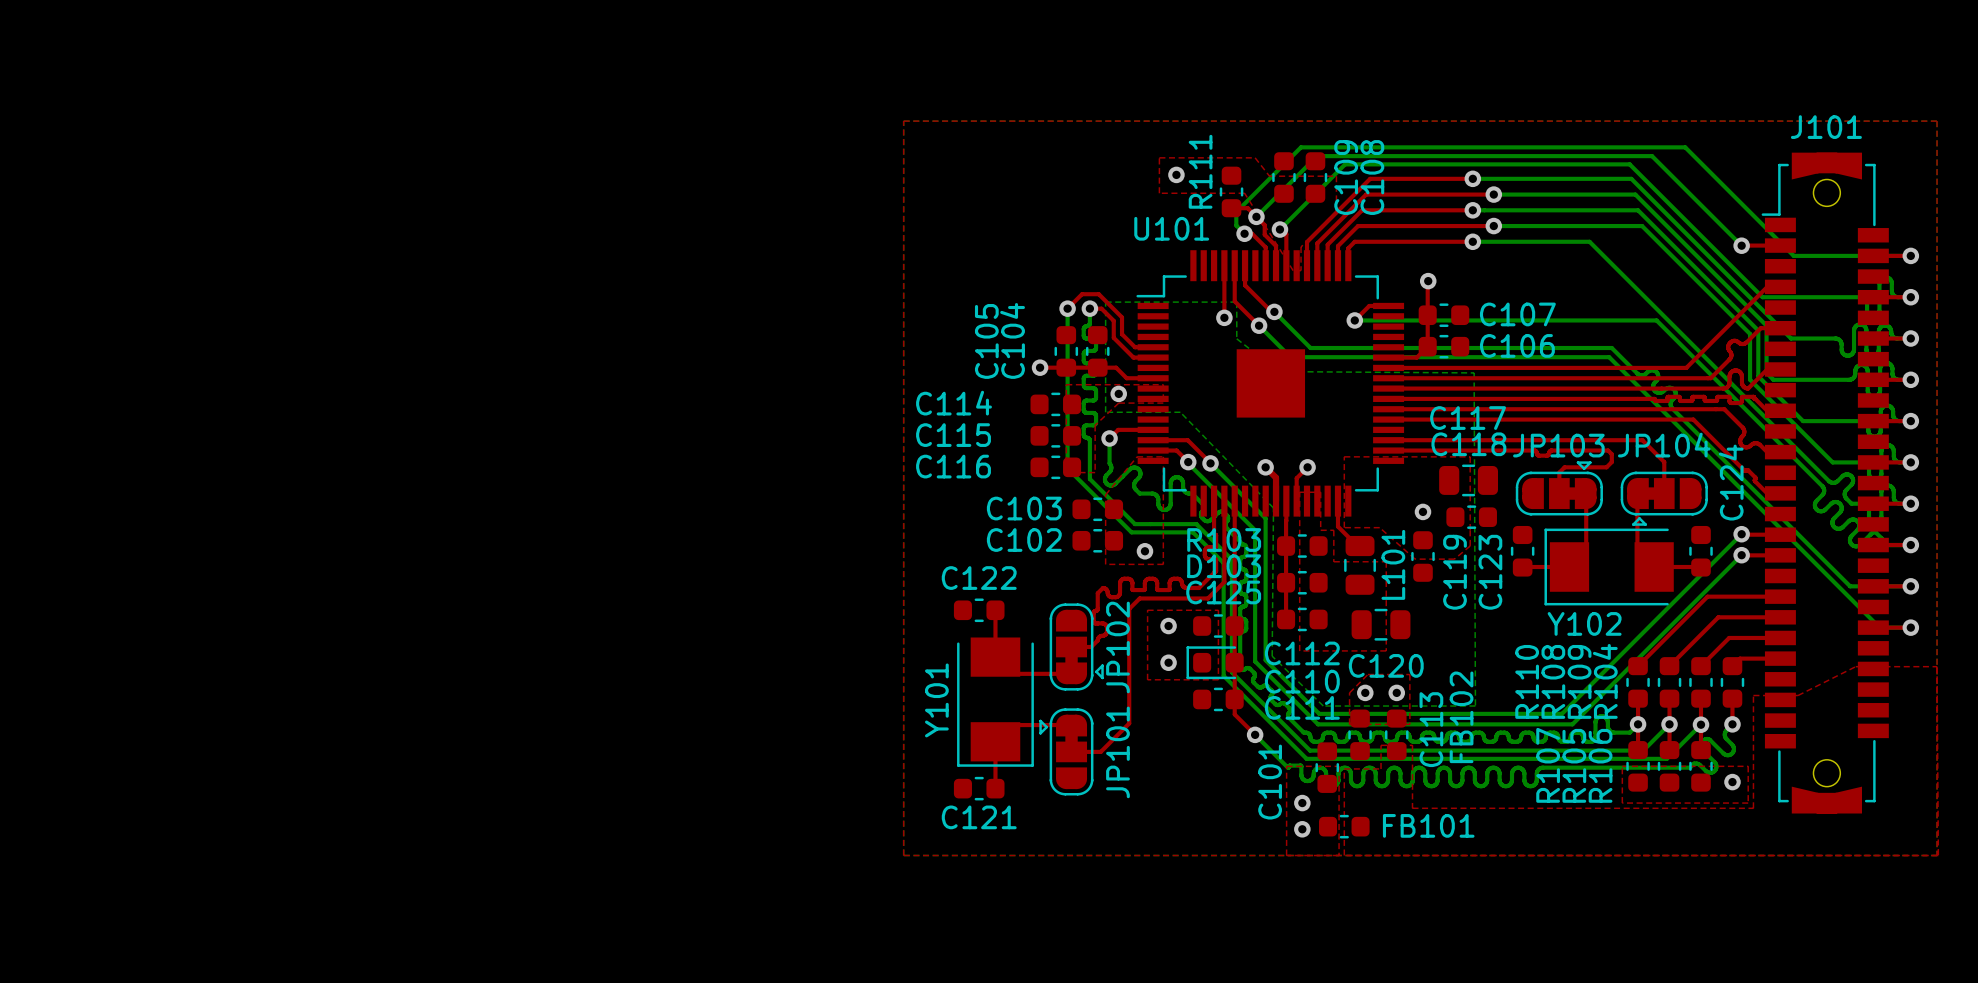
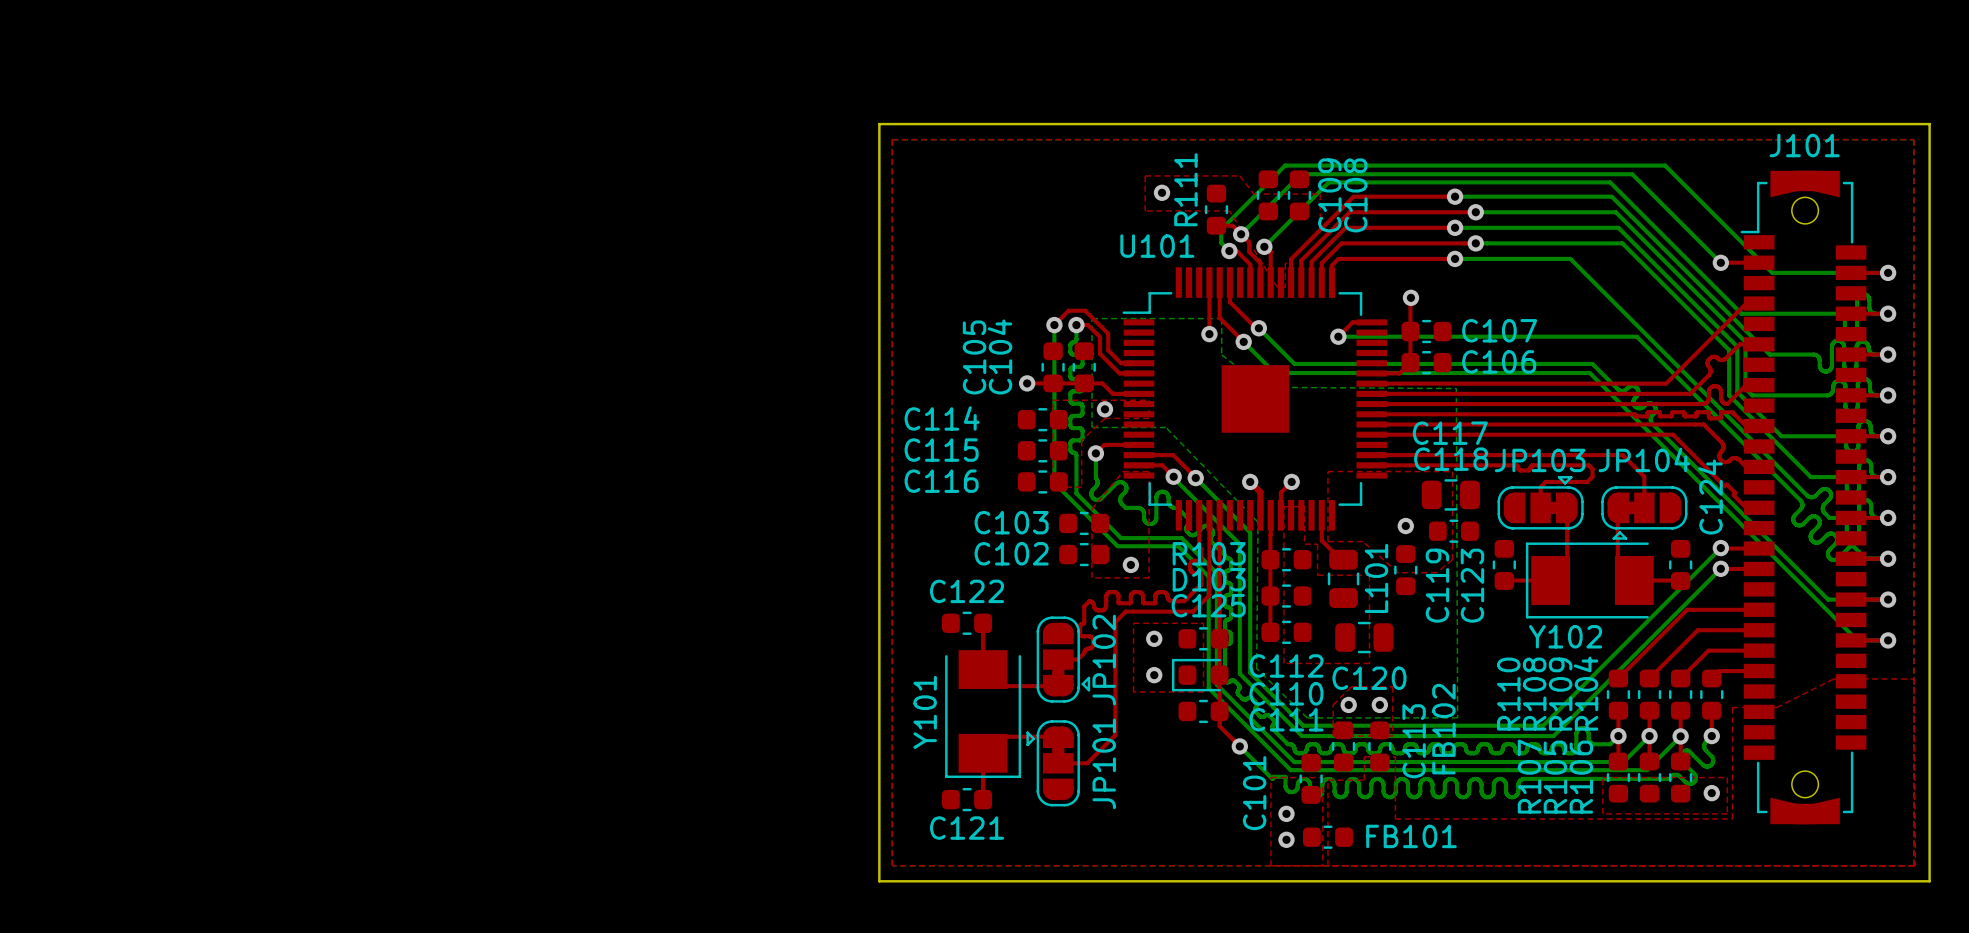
board edge: none -> (879, 124) (1929, 124) (1929, 881) (879, 881) (879, 124)

